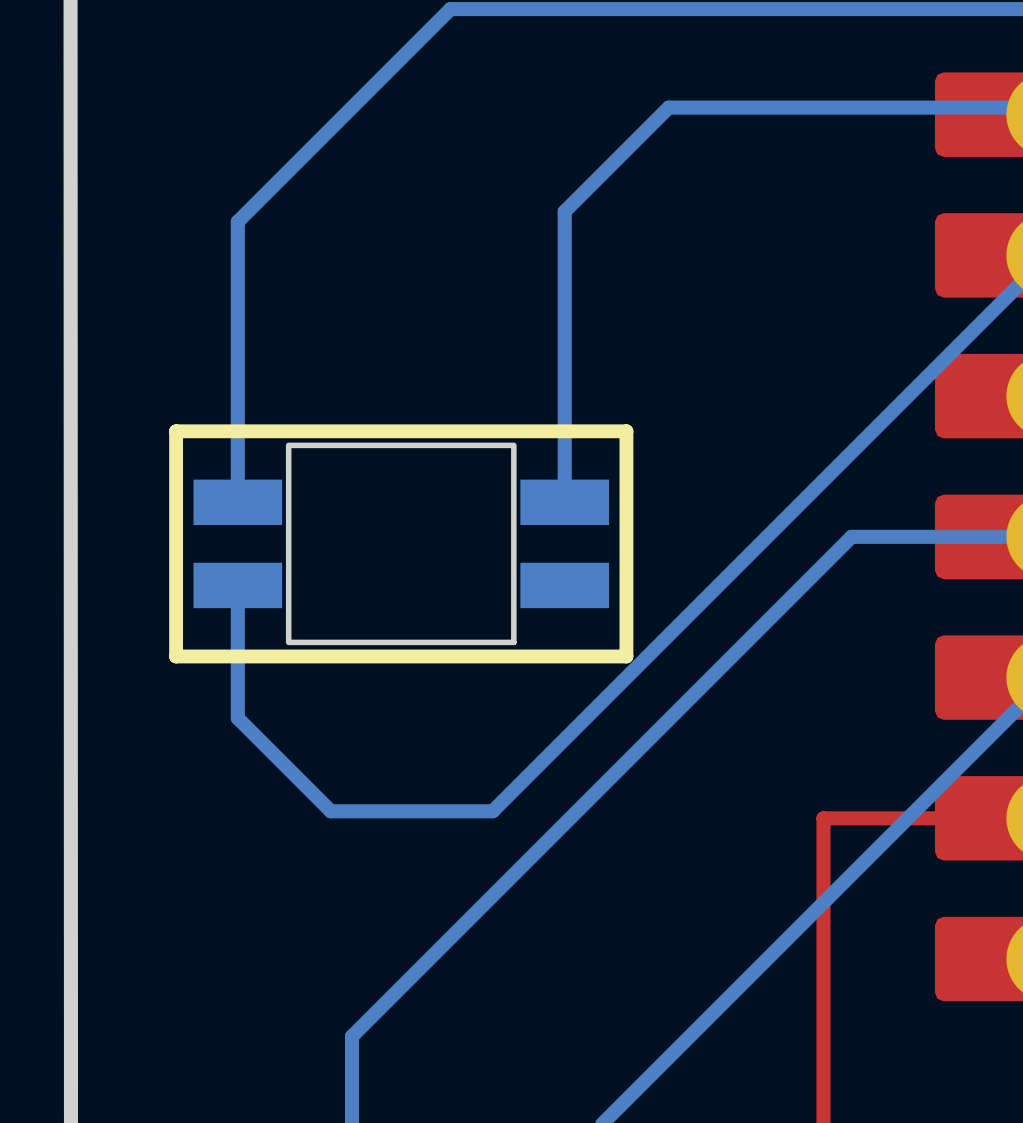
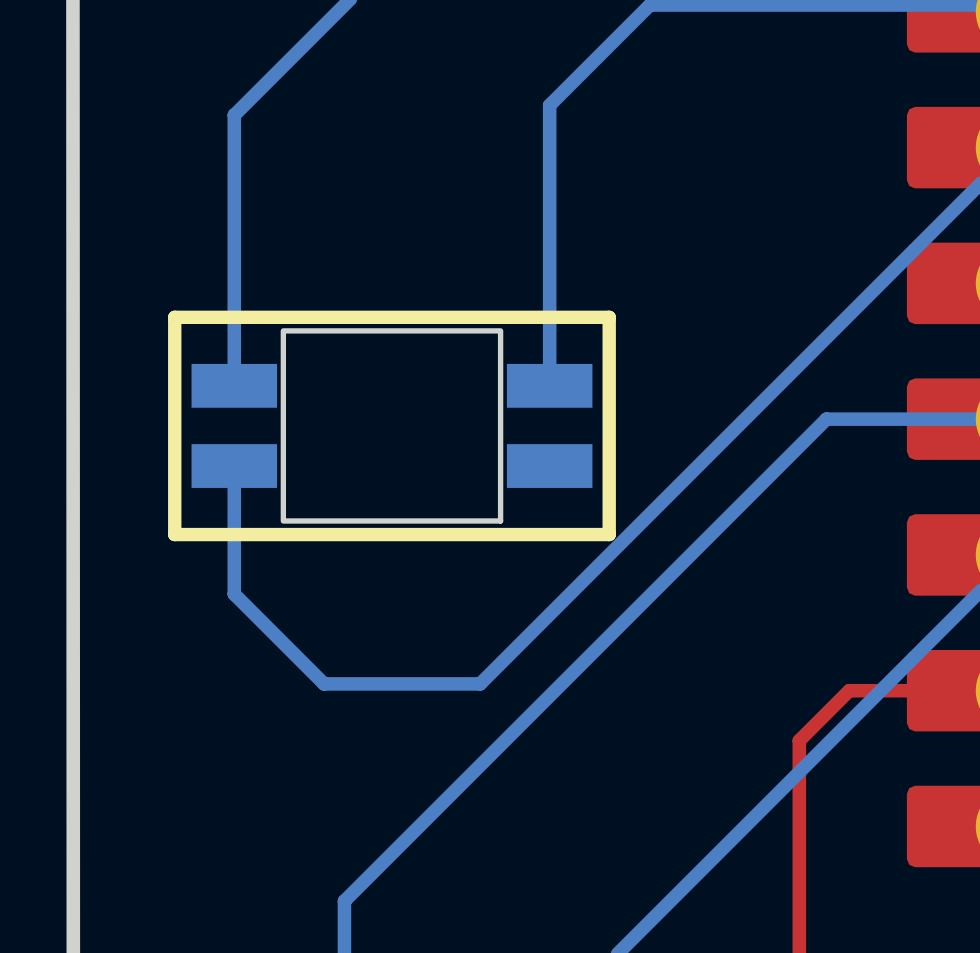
top track: (875, 818) (823, 818) (823, 870) -> (849, 690) (799, 740)

